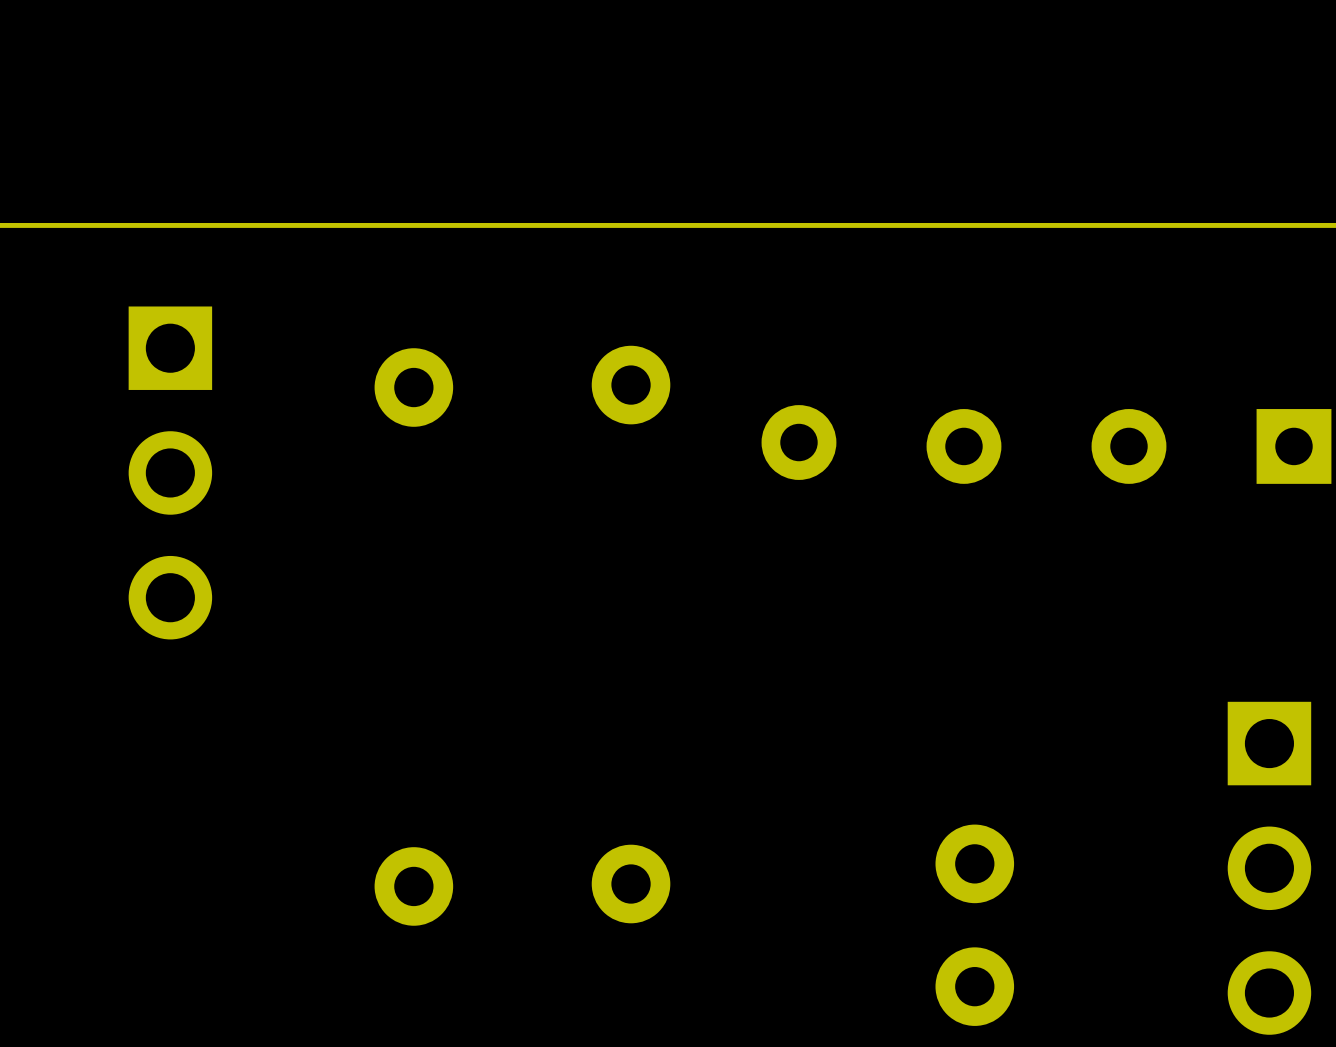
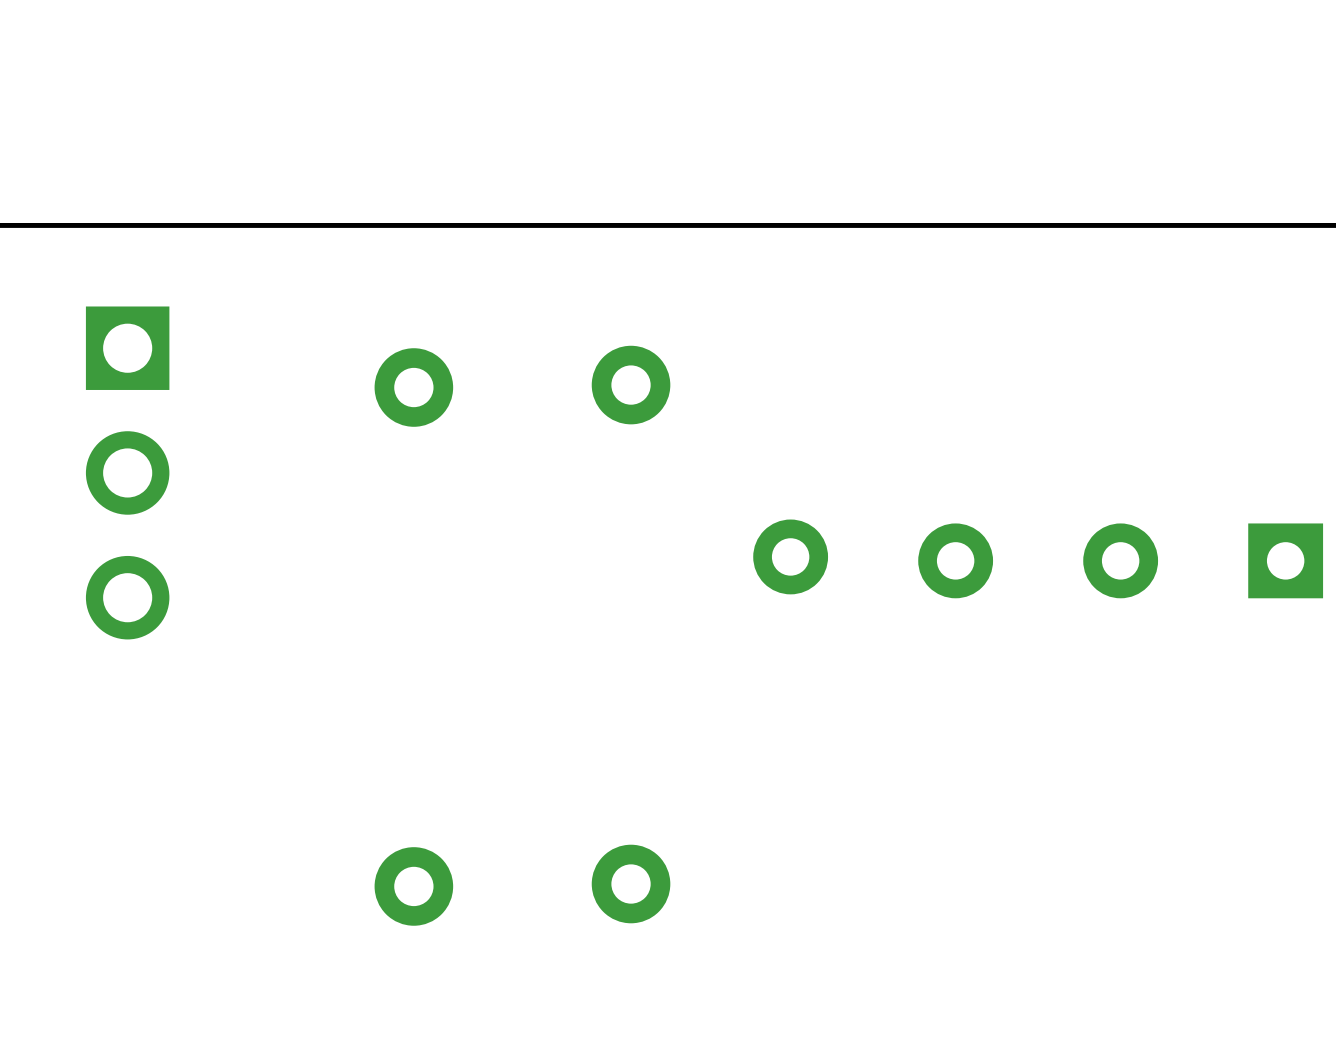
part position: (1046, 444) -> (1038, 558)
part position: (170, 472) -> (127, 472)
part: (1269, 868) -> none
part: (974, 925) -> none

